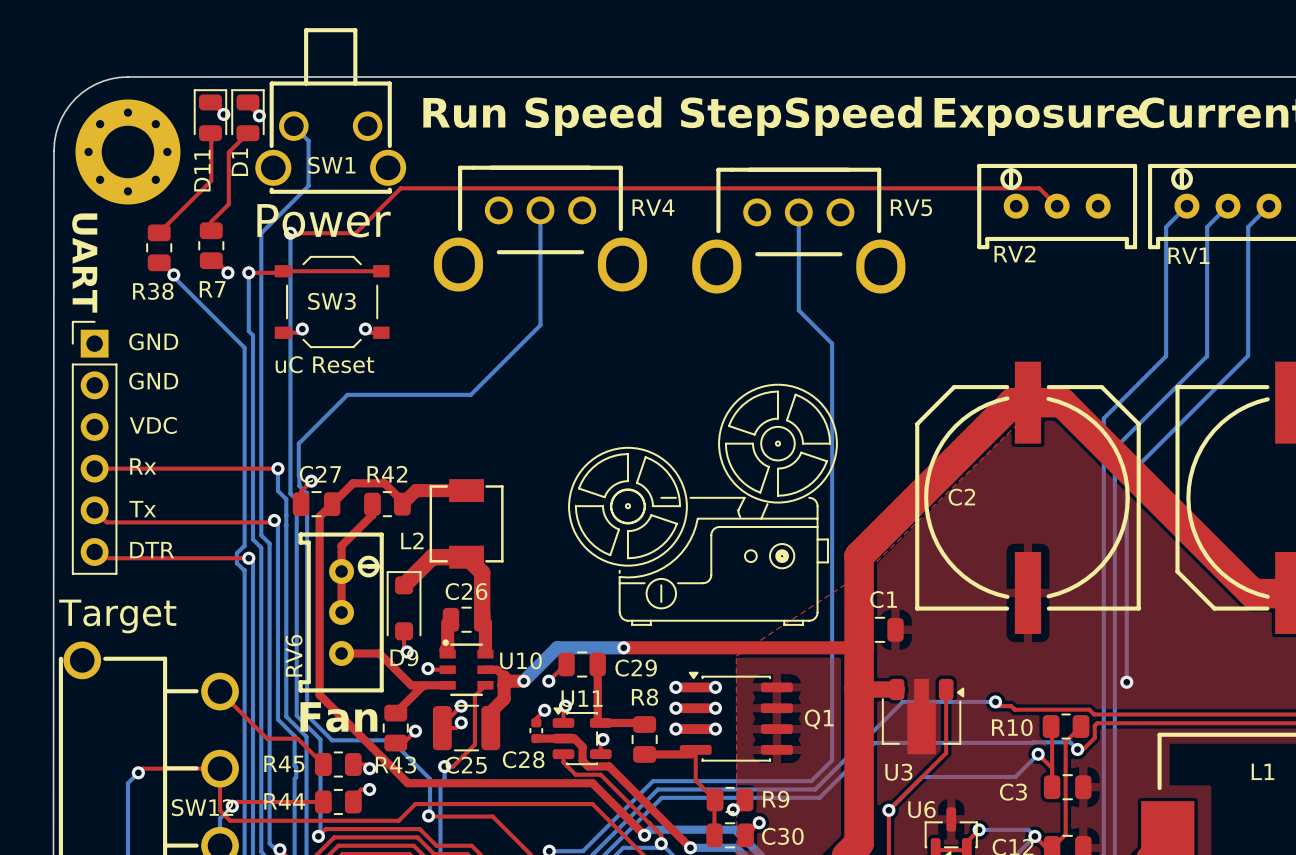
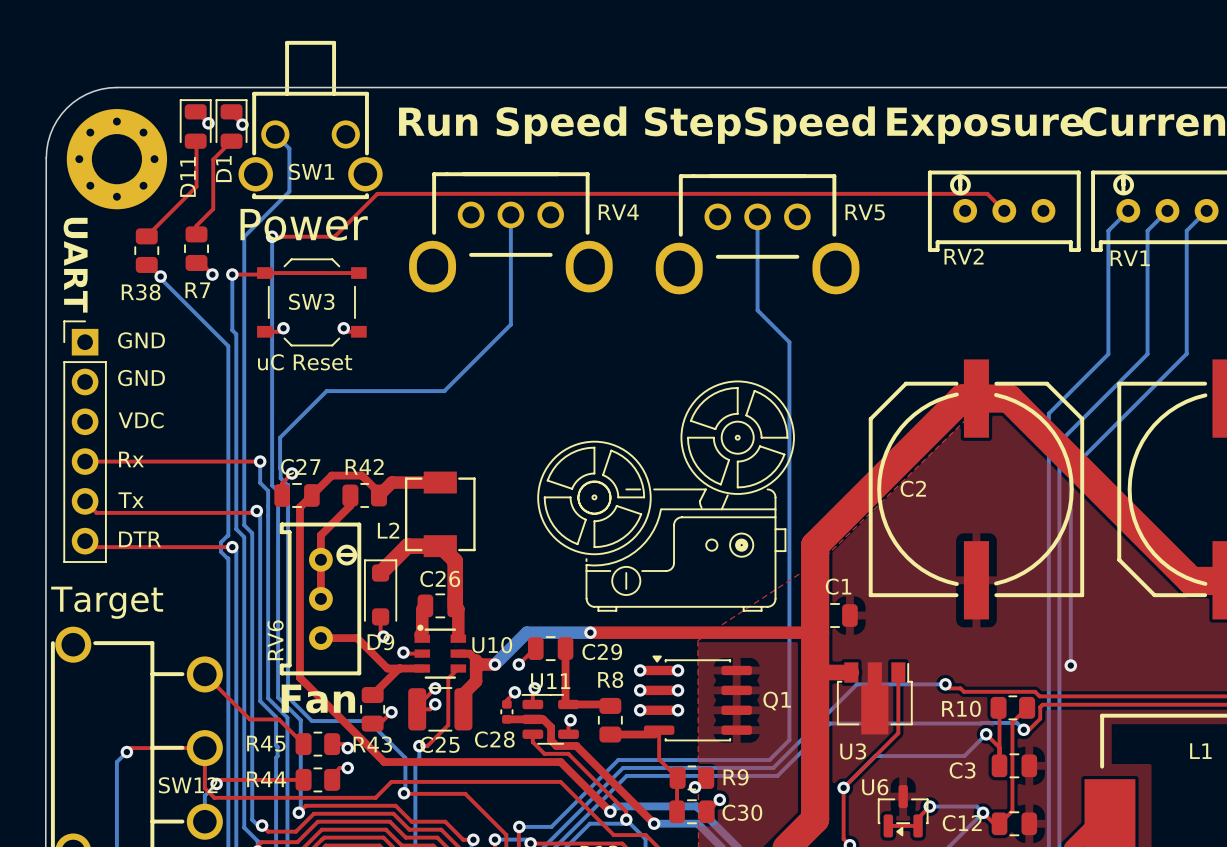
U3 footprint: [881, 678, 965, 755] -> [836, 662, 913, 735]
U11 footprint: [552, 707, 612, 766] -> [521, 693, 579, 745]

